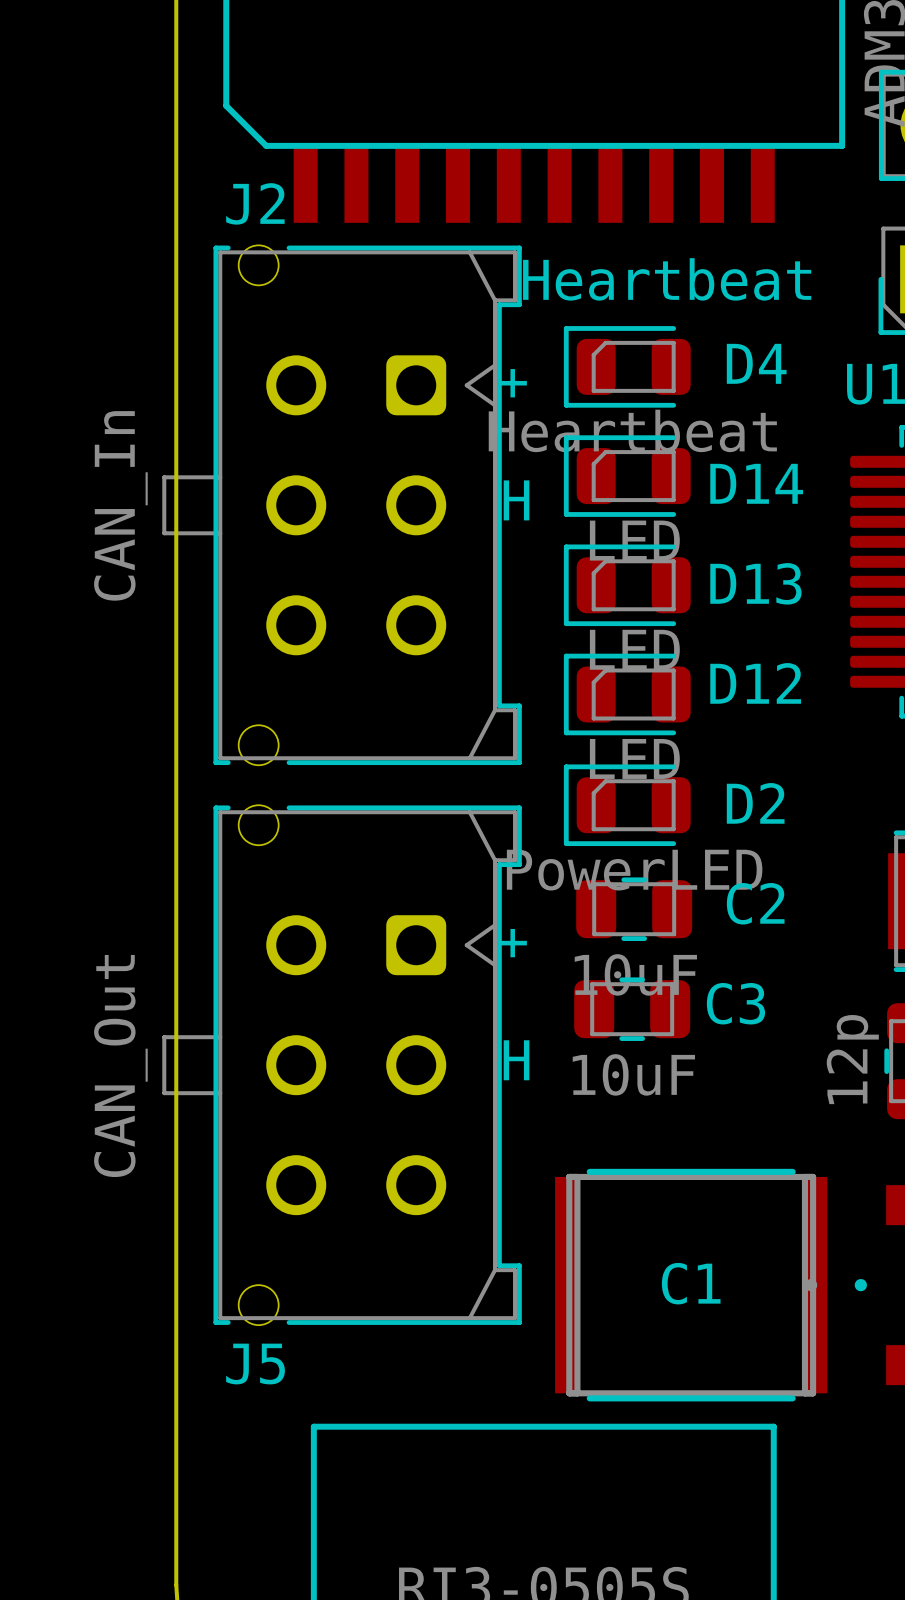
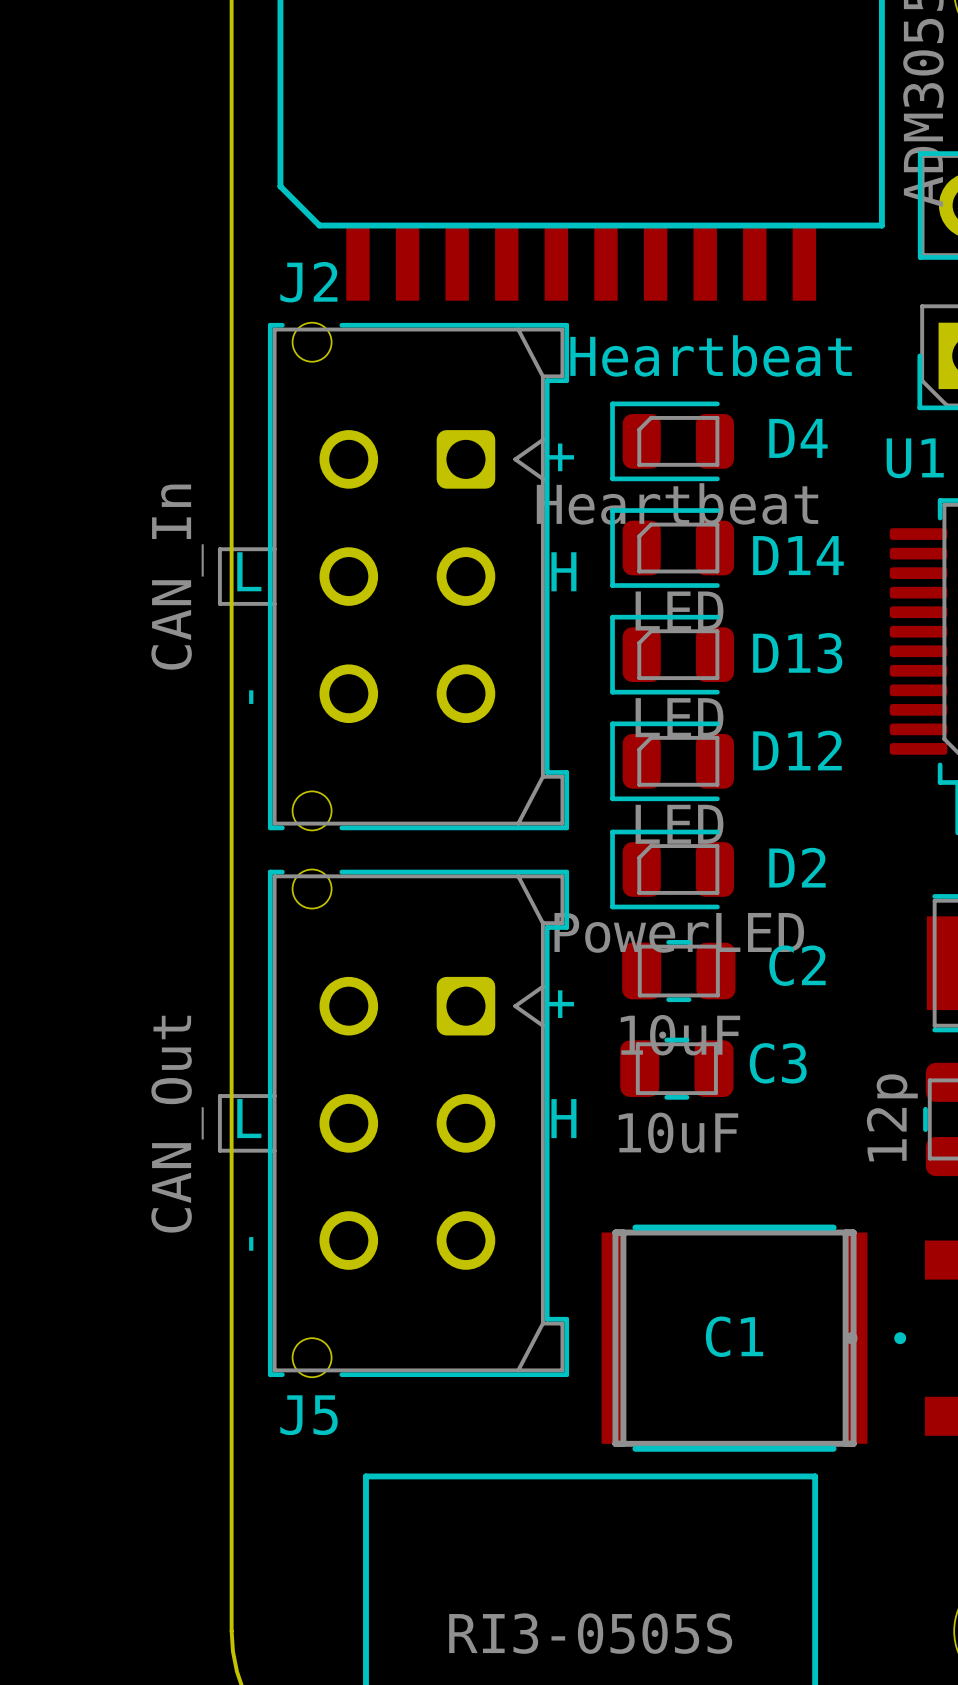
text: none -> L (249, 571)
text: none -> - (251, 697)
text: none -> L (249, 1118)
text: none -> - (251, 1243)

